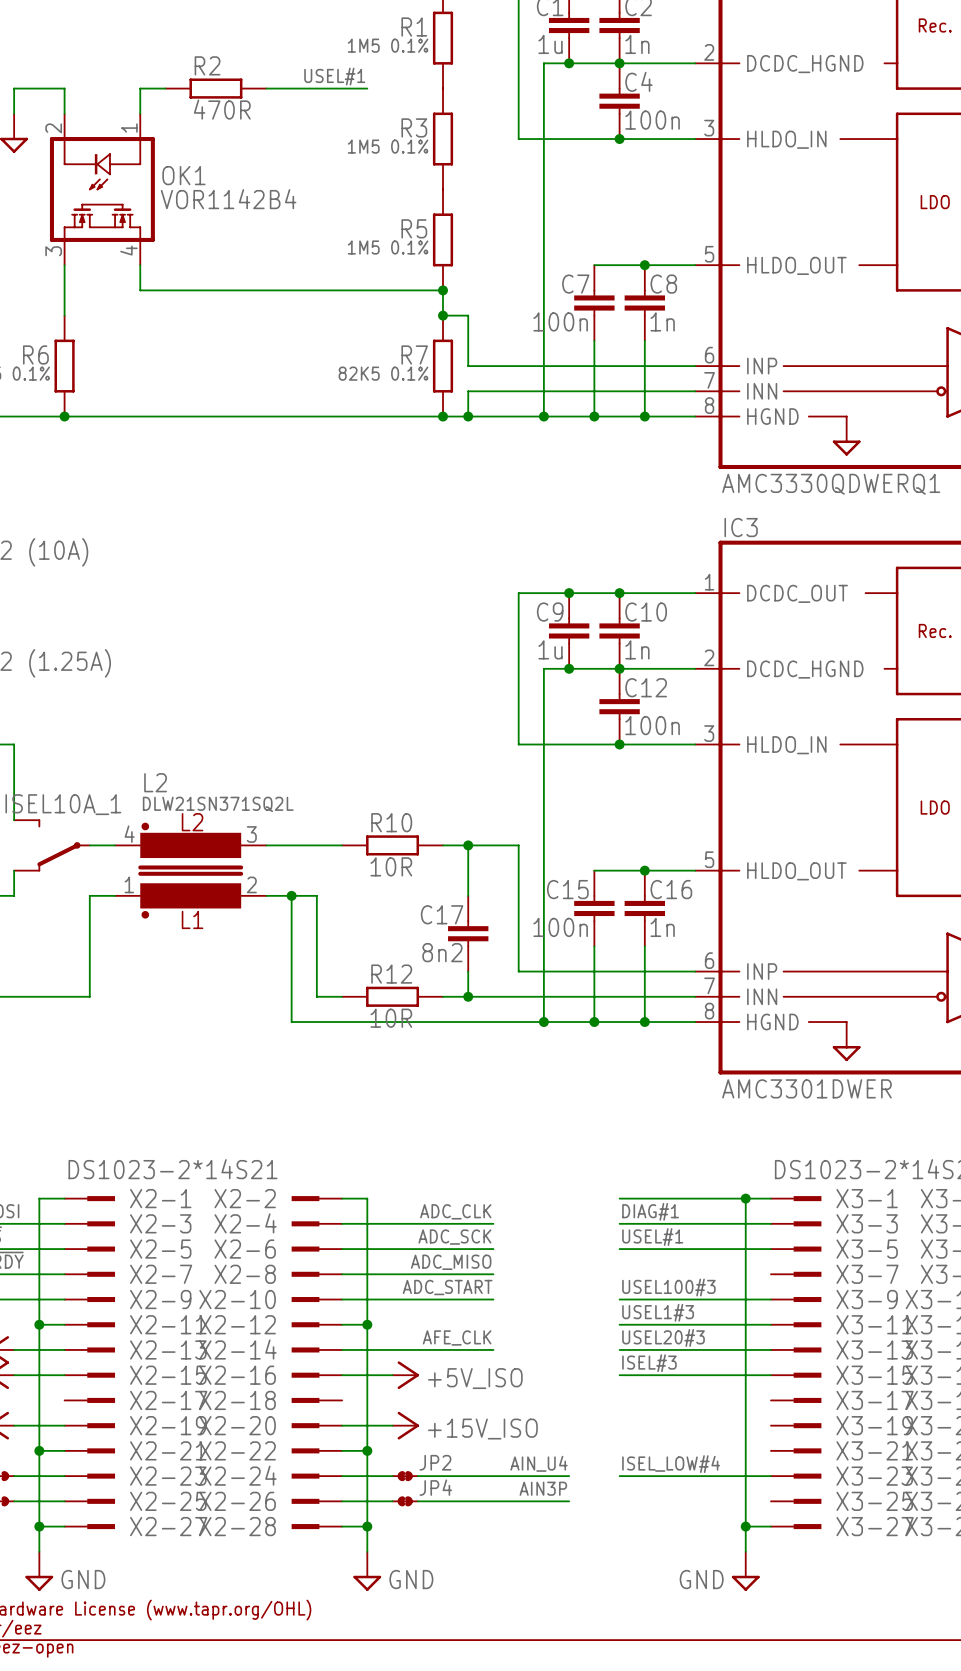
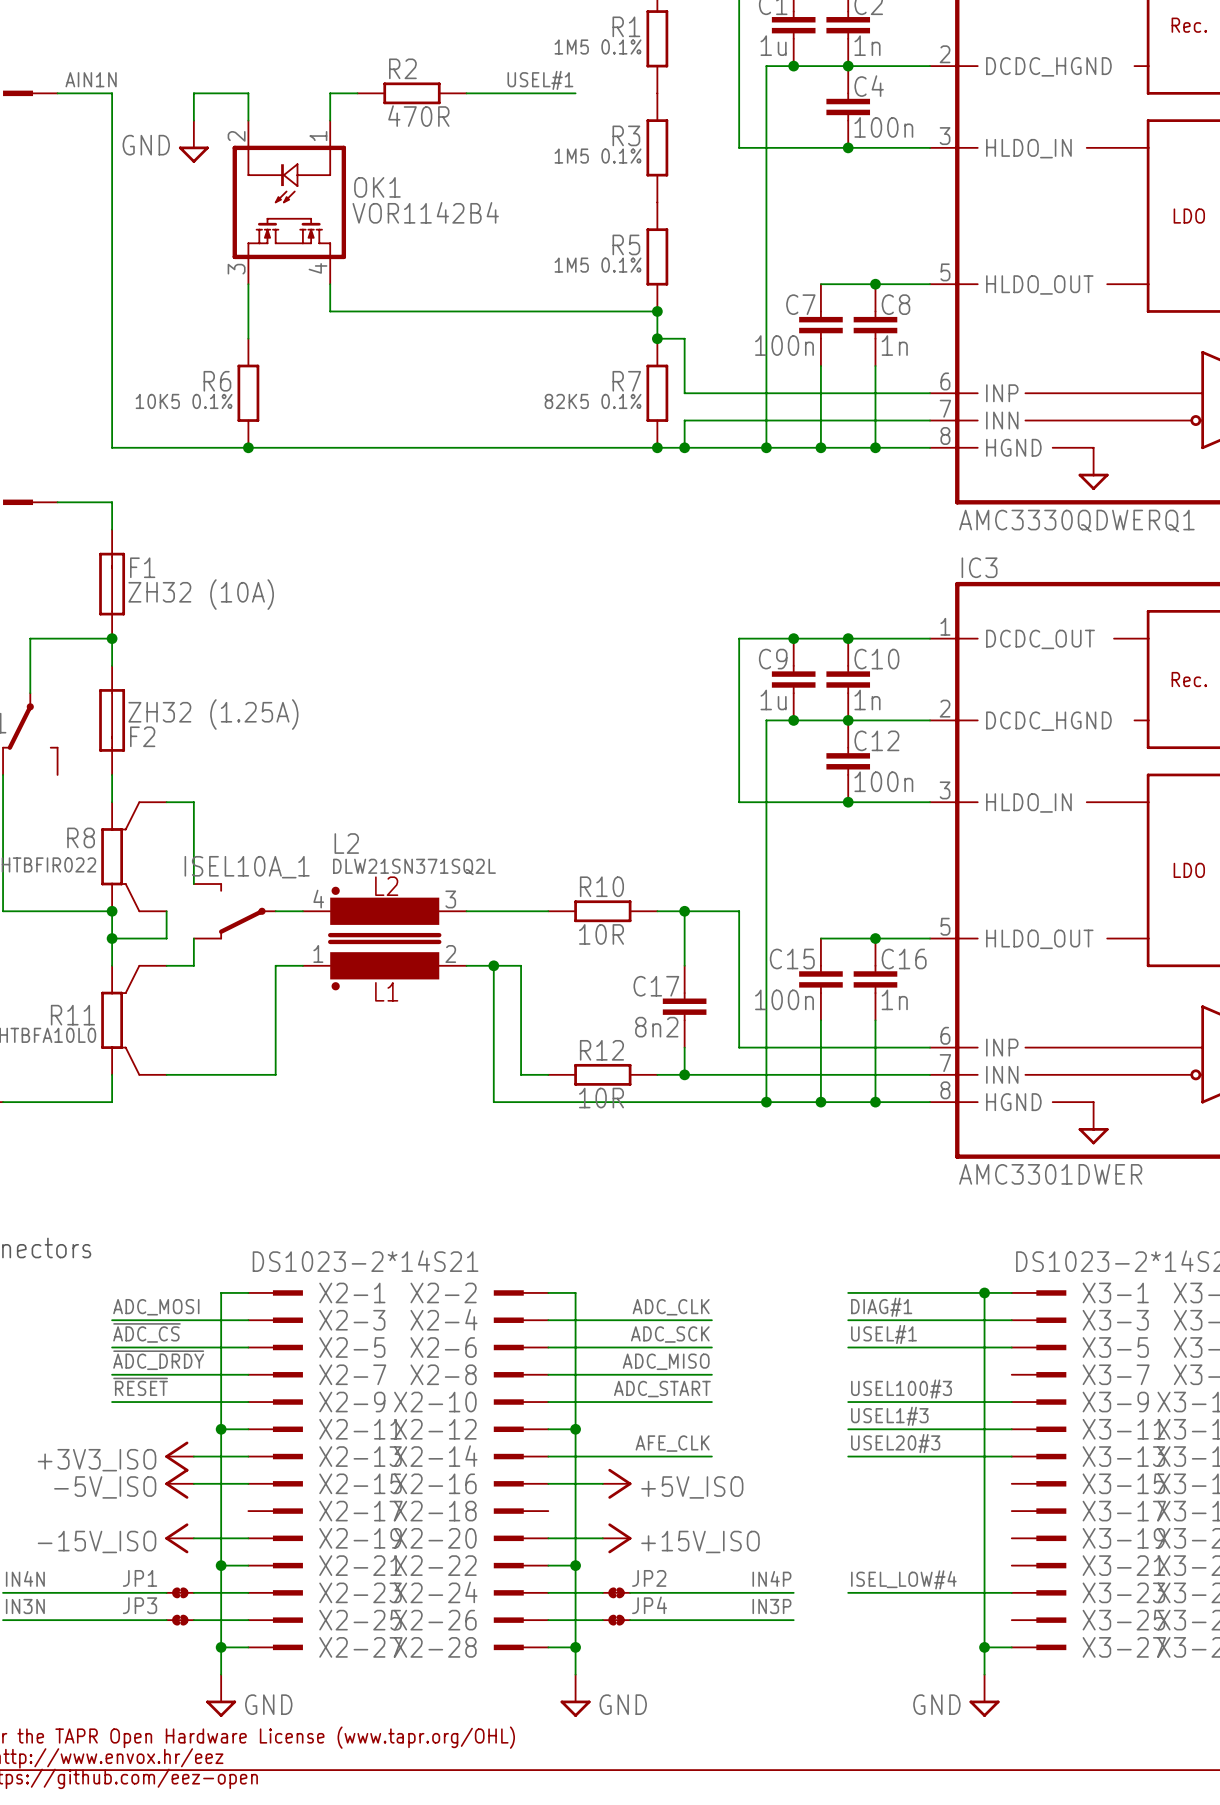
label: ISEL#3 (649, 1363) -> none
wire: (619, 1375) (770, 1375) -> none
label: AIN_U4 (539, 1463) -> IN4P (771, 1578)
label: AIN3P (543, 1488) -> IN3P (771, 1606)

